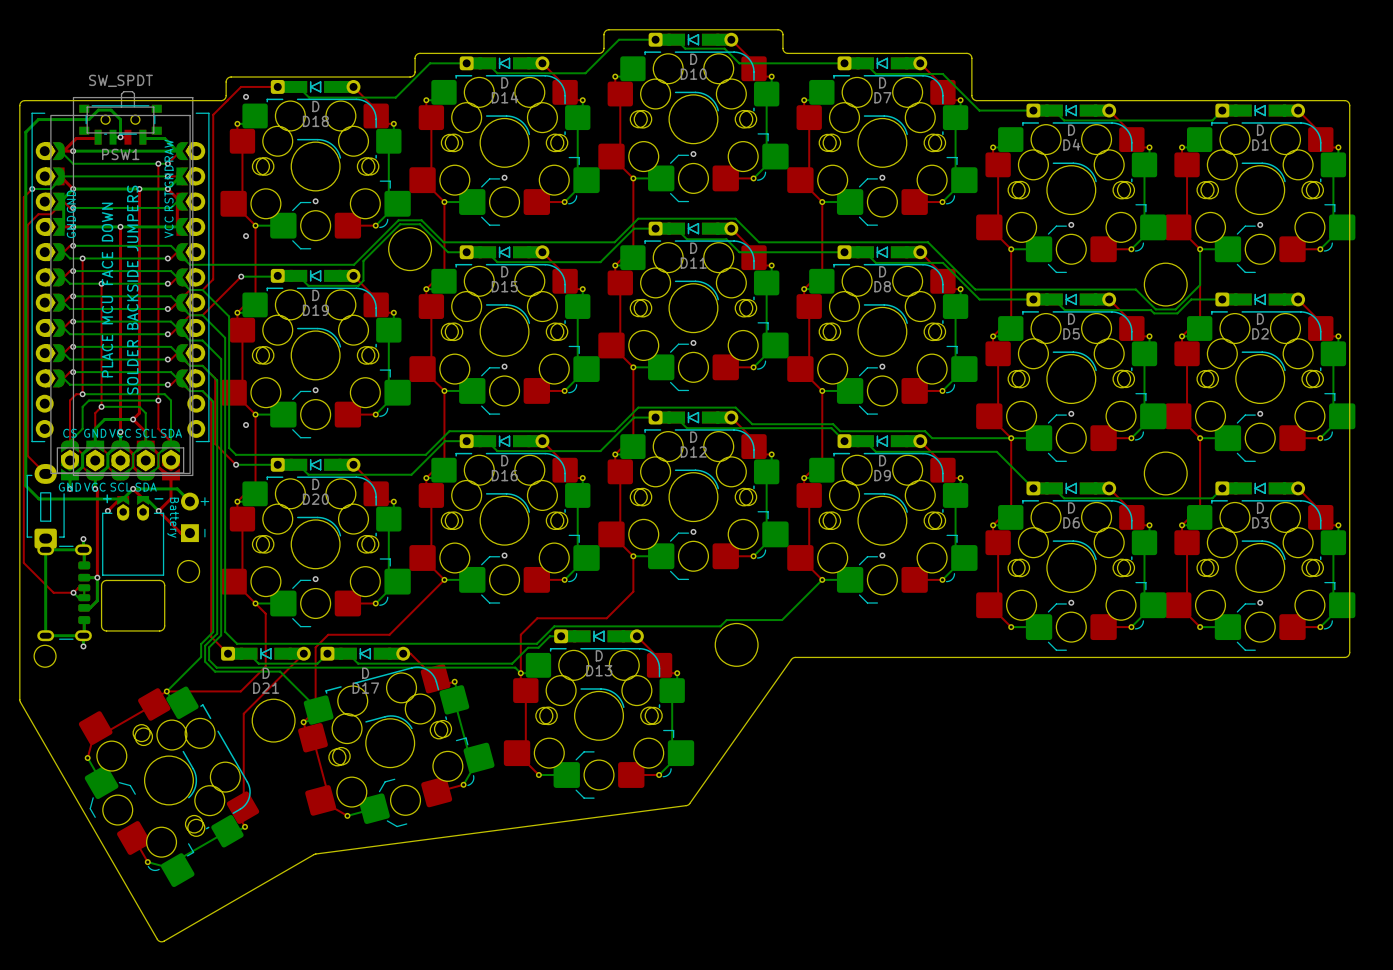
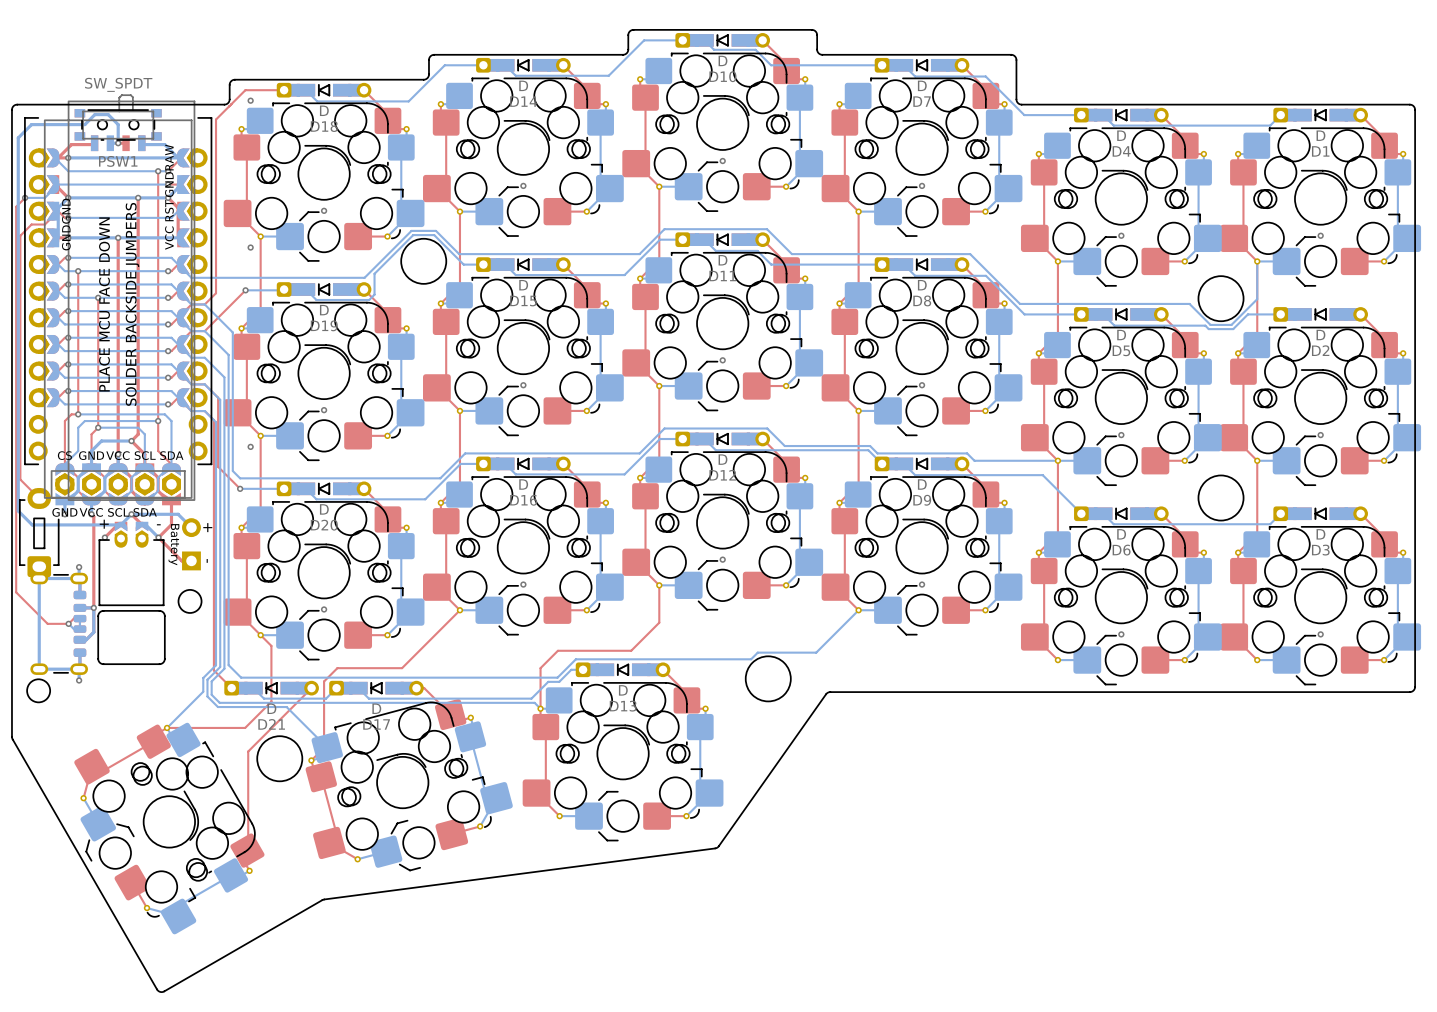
part footprint: [50, 97, 194, 481] -> [44, 100, 195, 506]

